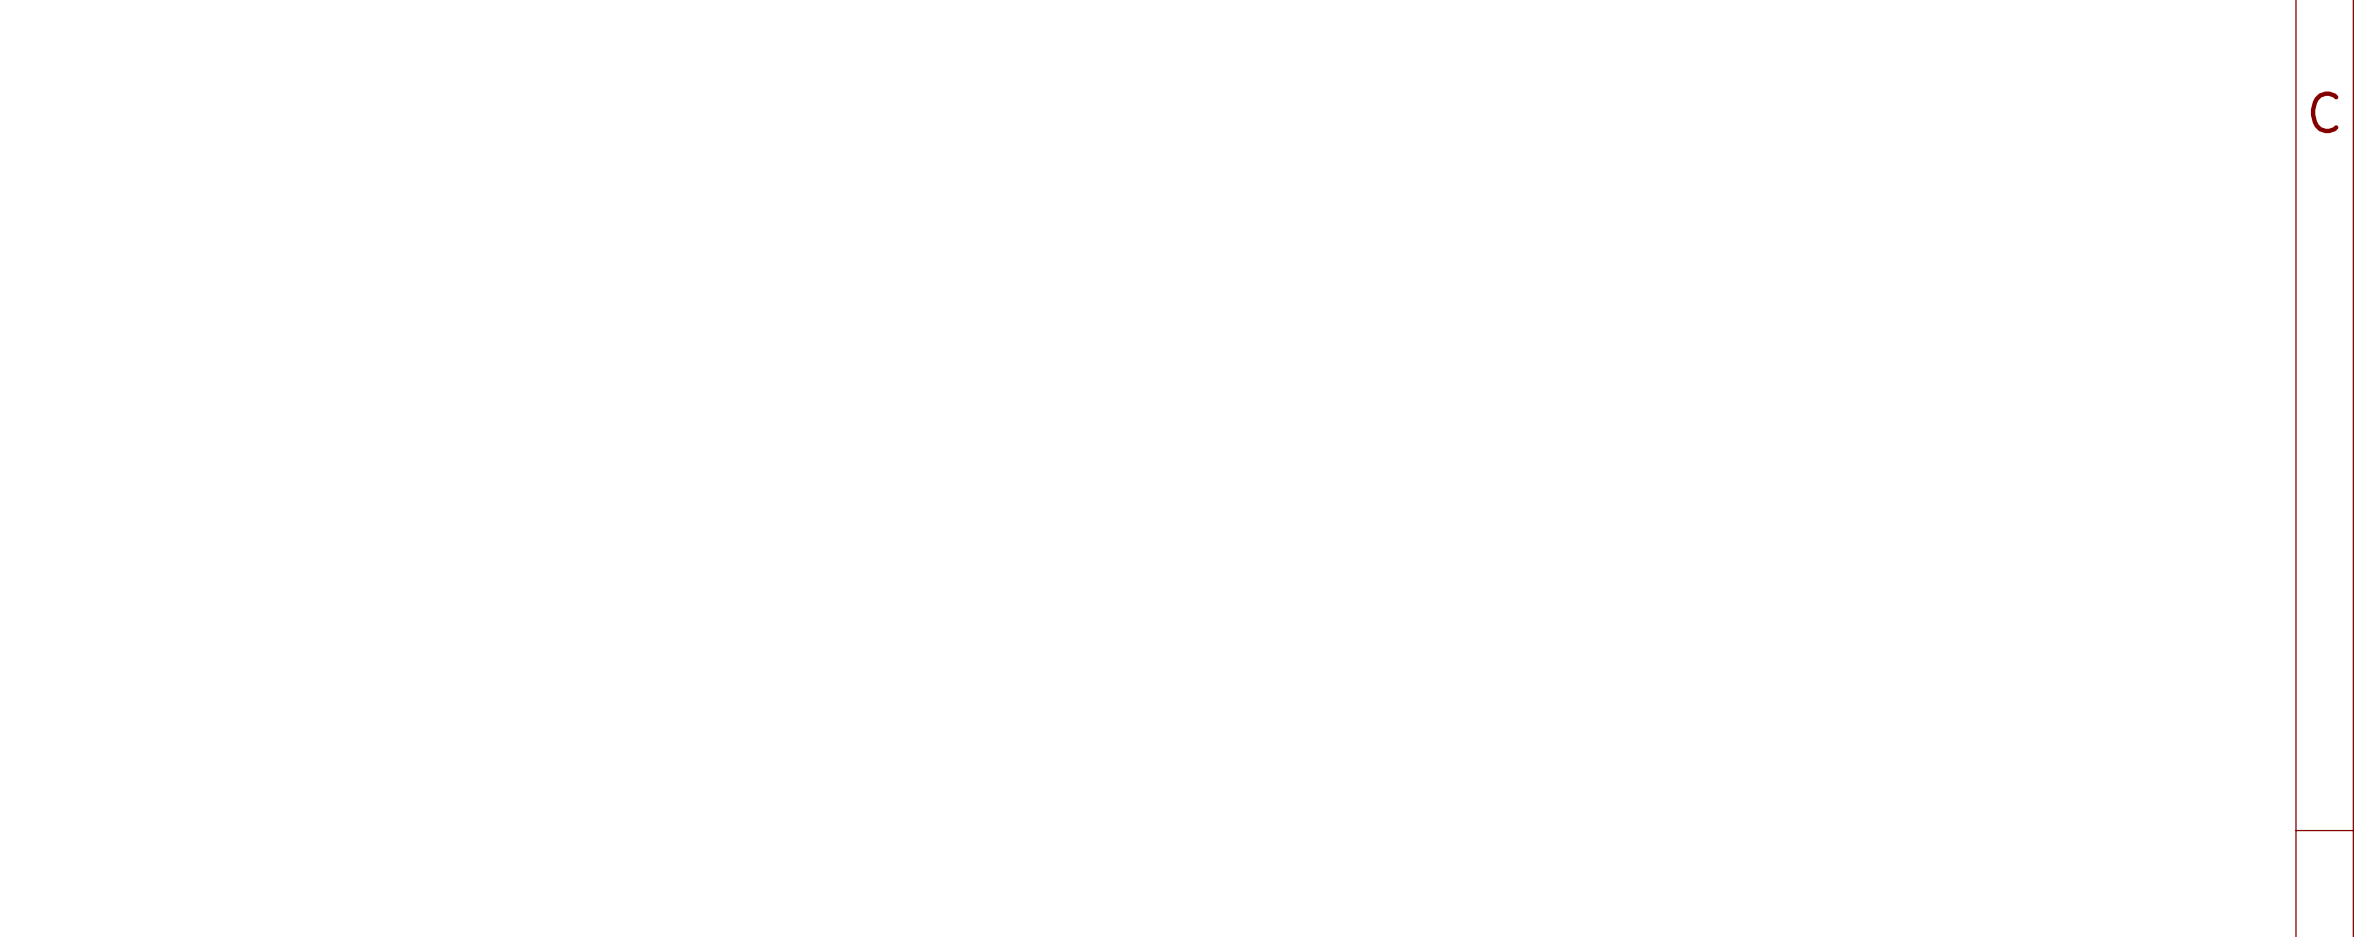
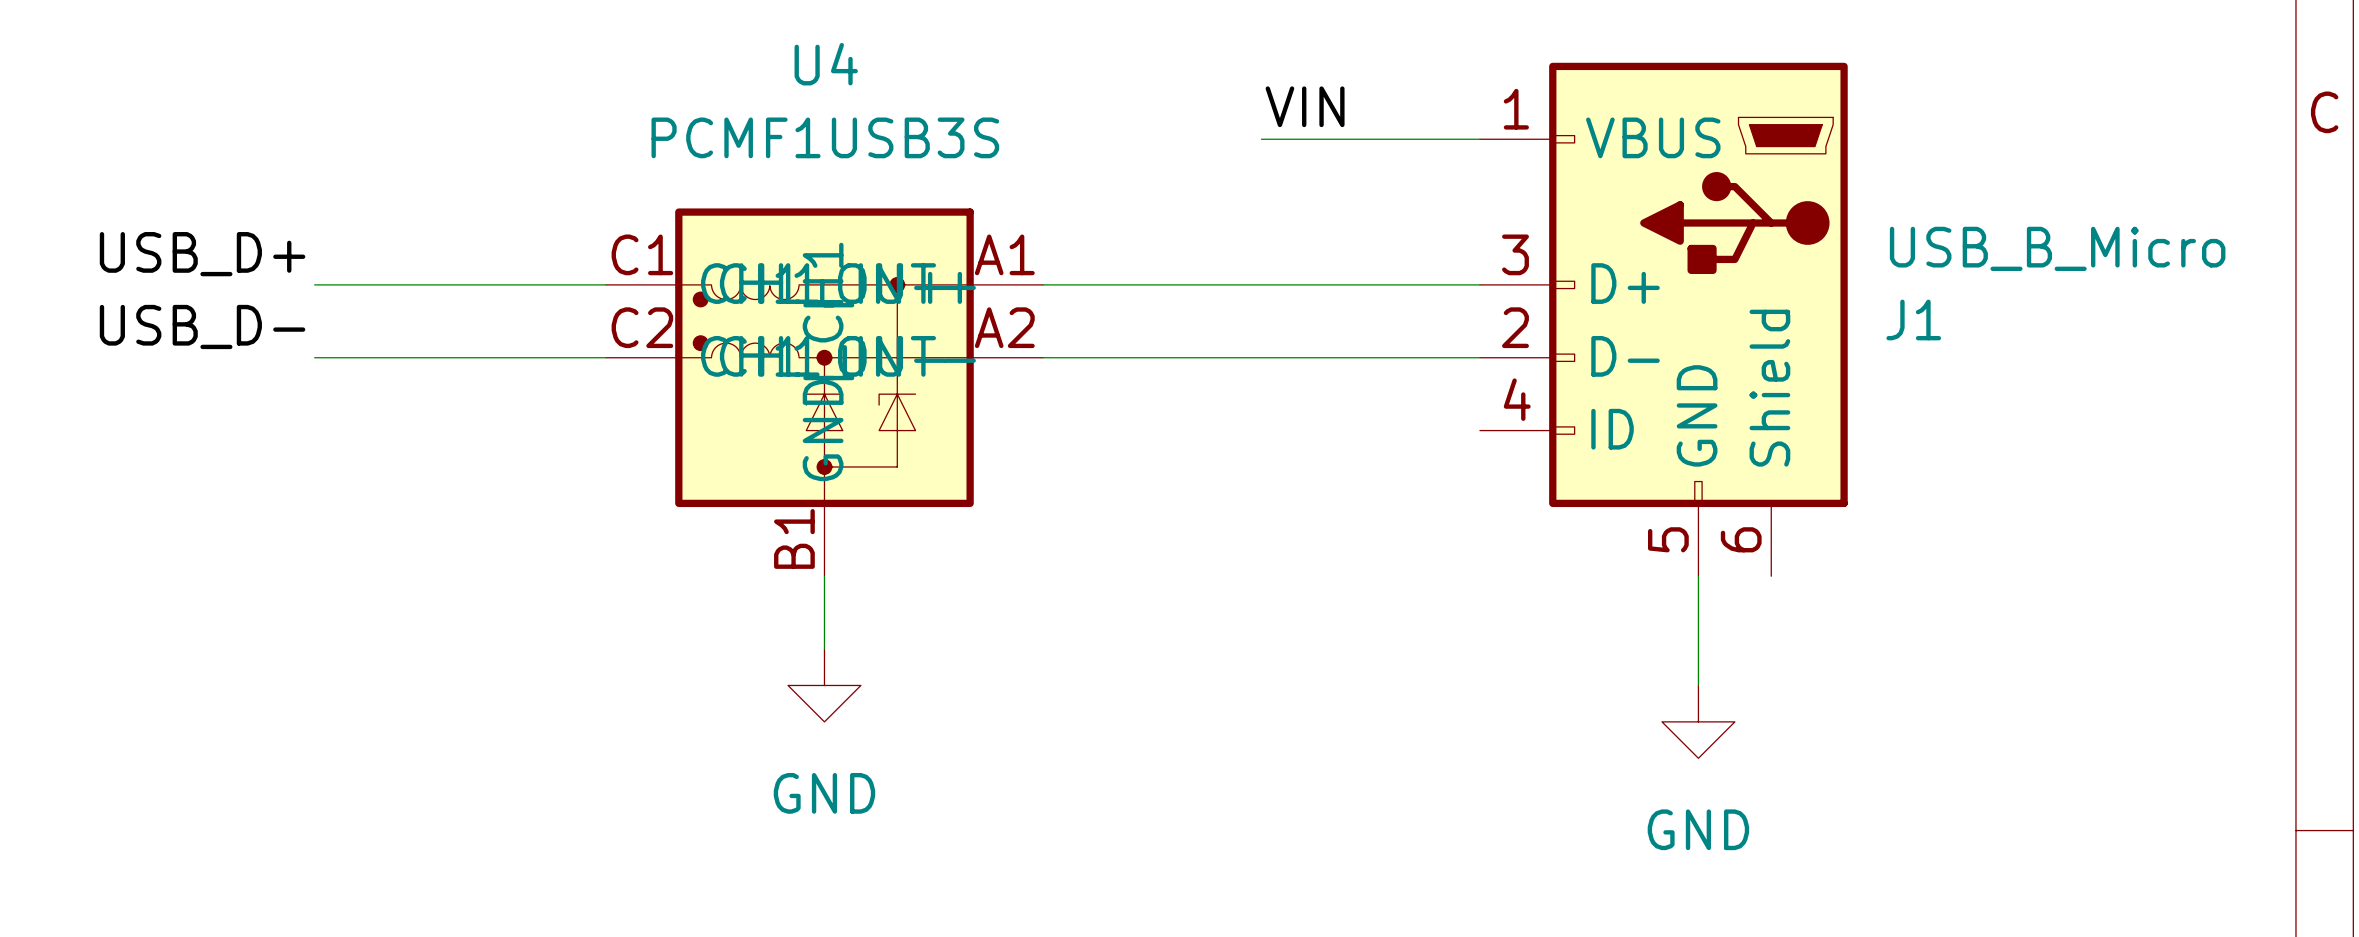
label: none -> VIN (1305, 106)
wire: none -> (1261, 139) (1479, 139)
label: none -> USB_D+ (202, 254)
wire: none -> (314, 284) (605, 284)
wire: none -> (1042, 284) (1479, 284)
J1: none -> USB_B_Micro (1663, 319)
label: none -> USB_D- (202, 326)
wire: none -> (314, 357) (605, 357)
wire: none -> (1042, 357) (1479, 357)
U4: none -> PCMF1USB3S (824, 392)
wire: none -> (824, 576) (824, 649)
wire: none -> (1698, 576) (1698, 685)
power symbol: none -> GND (824, 685)
power symbol: none -> GND (1698, 721)

